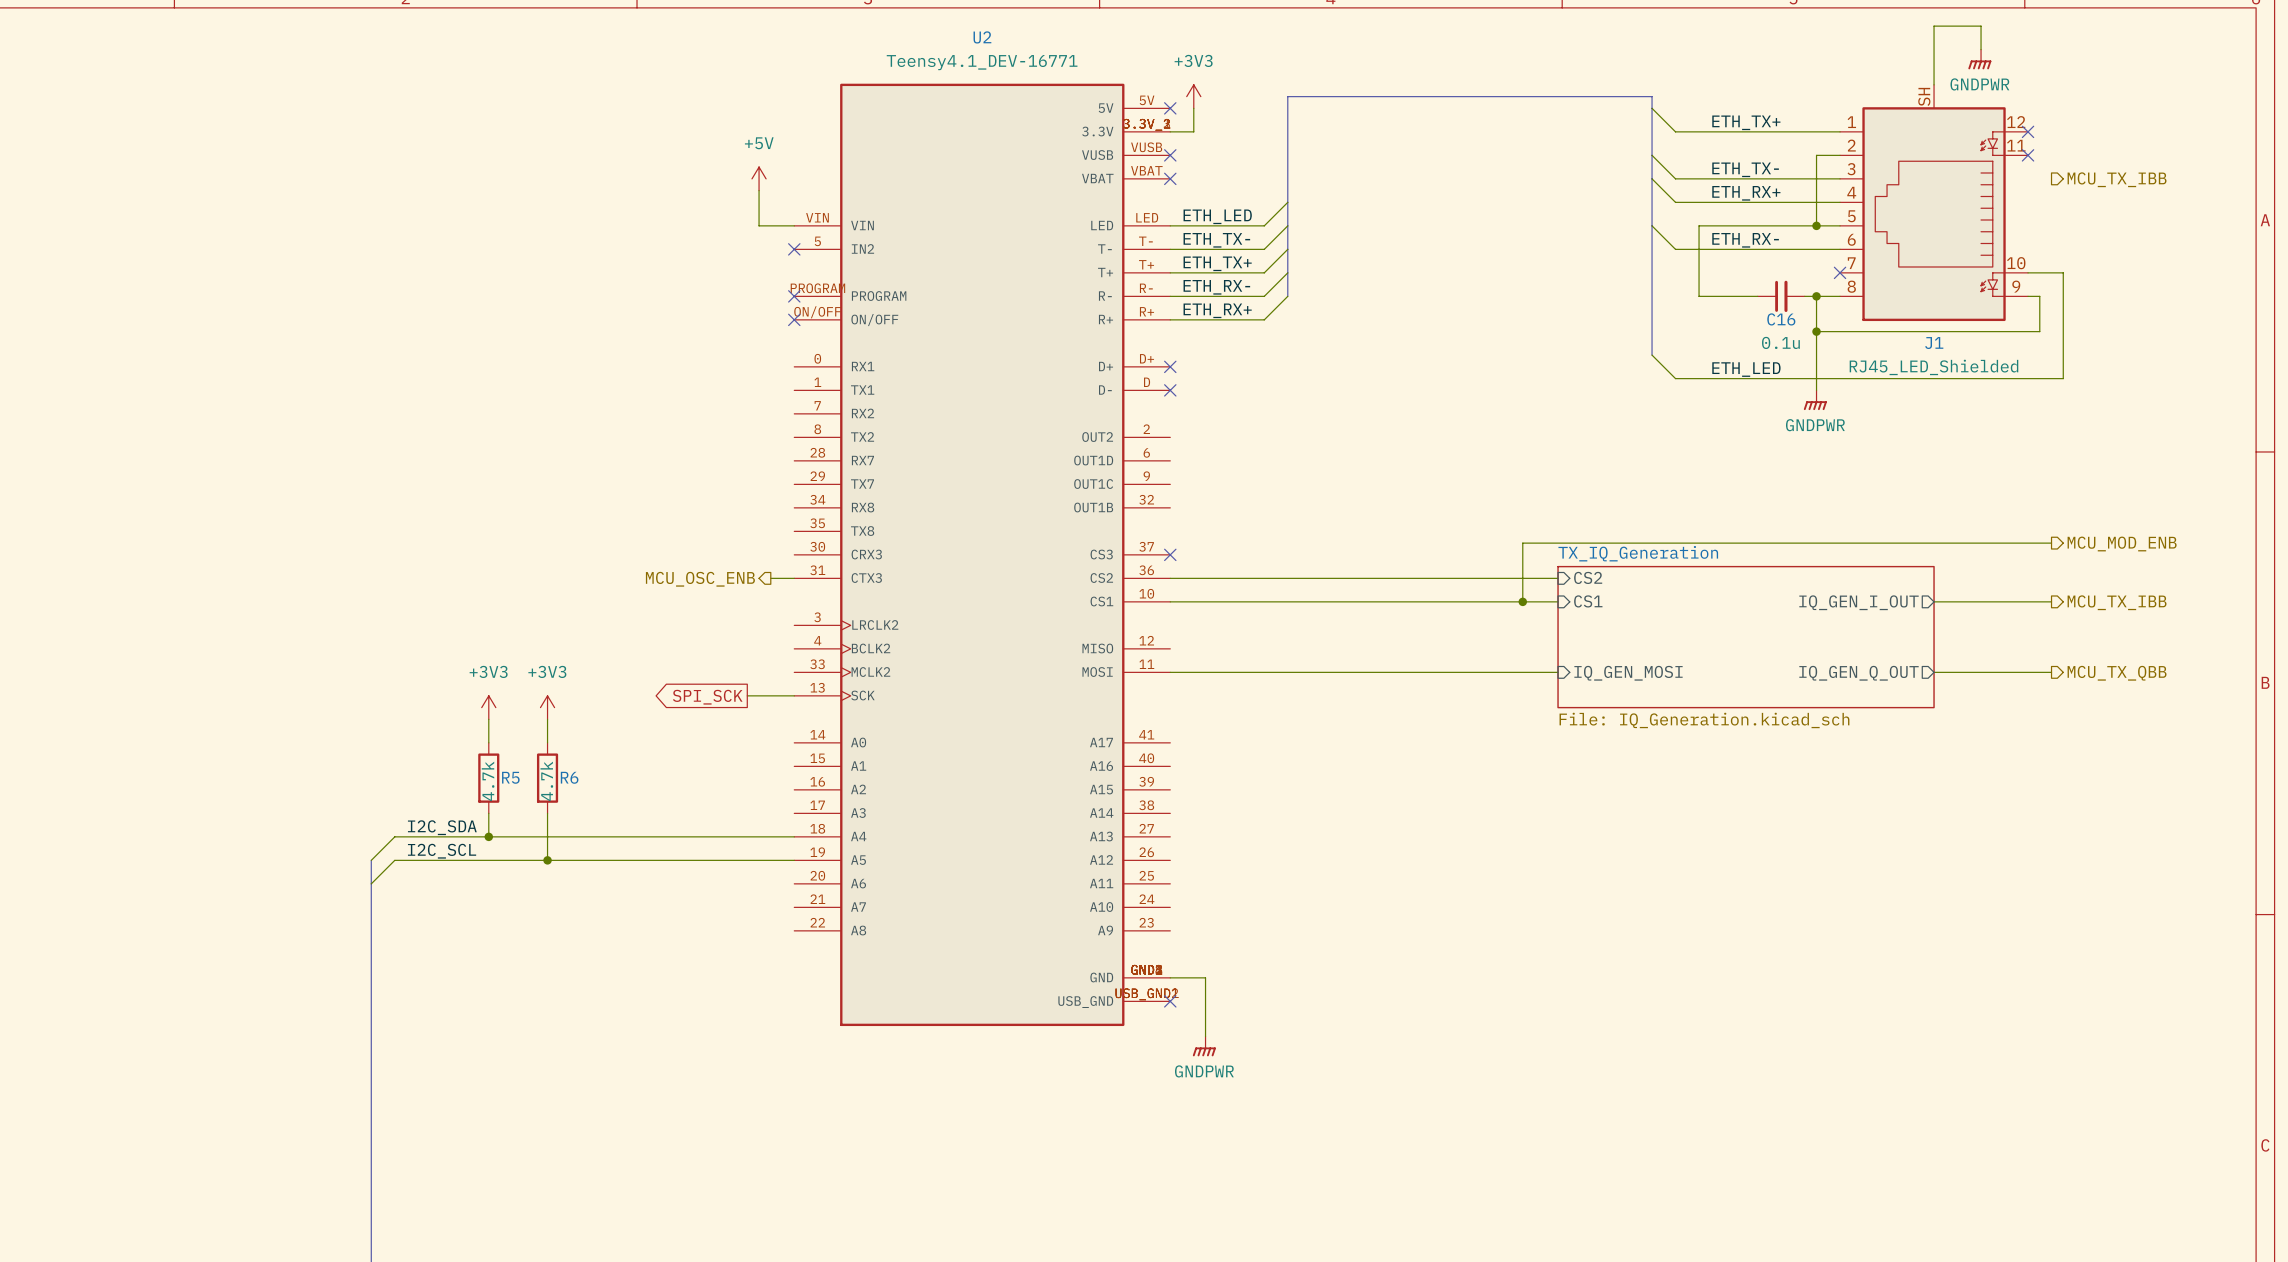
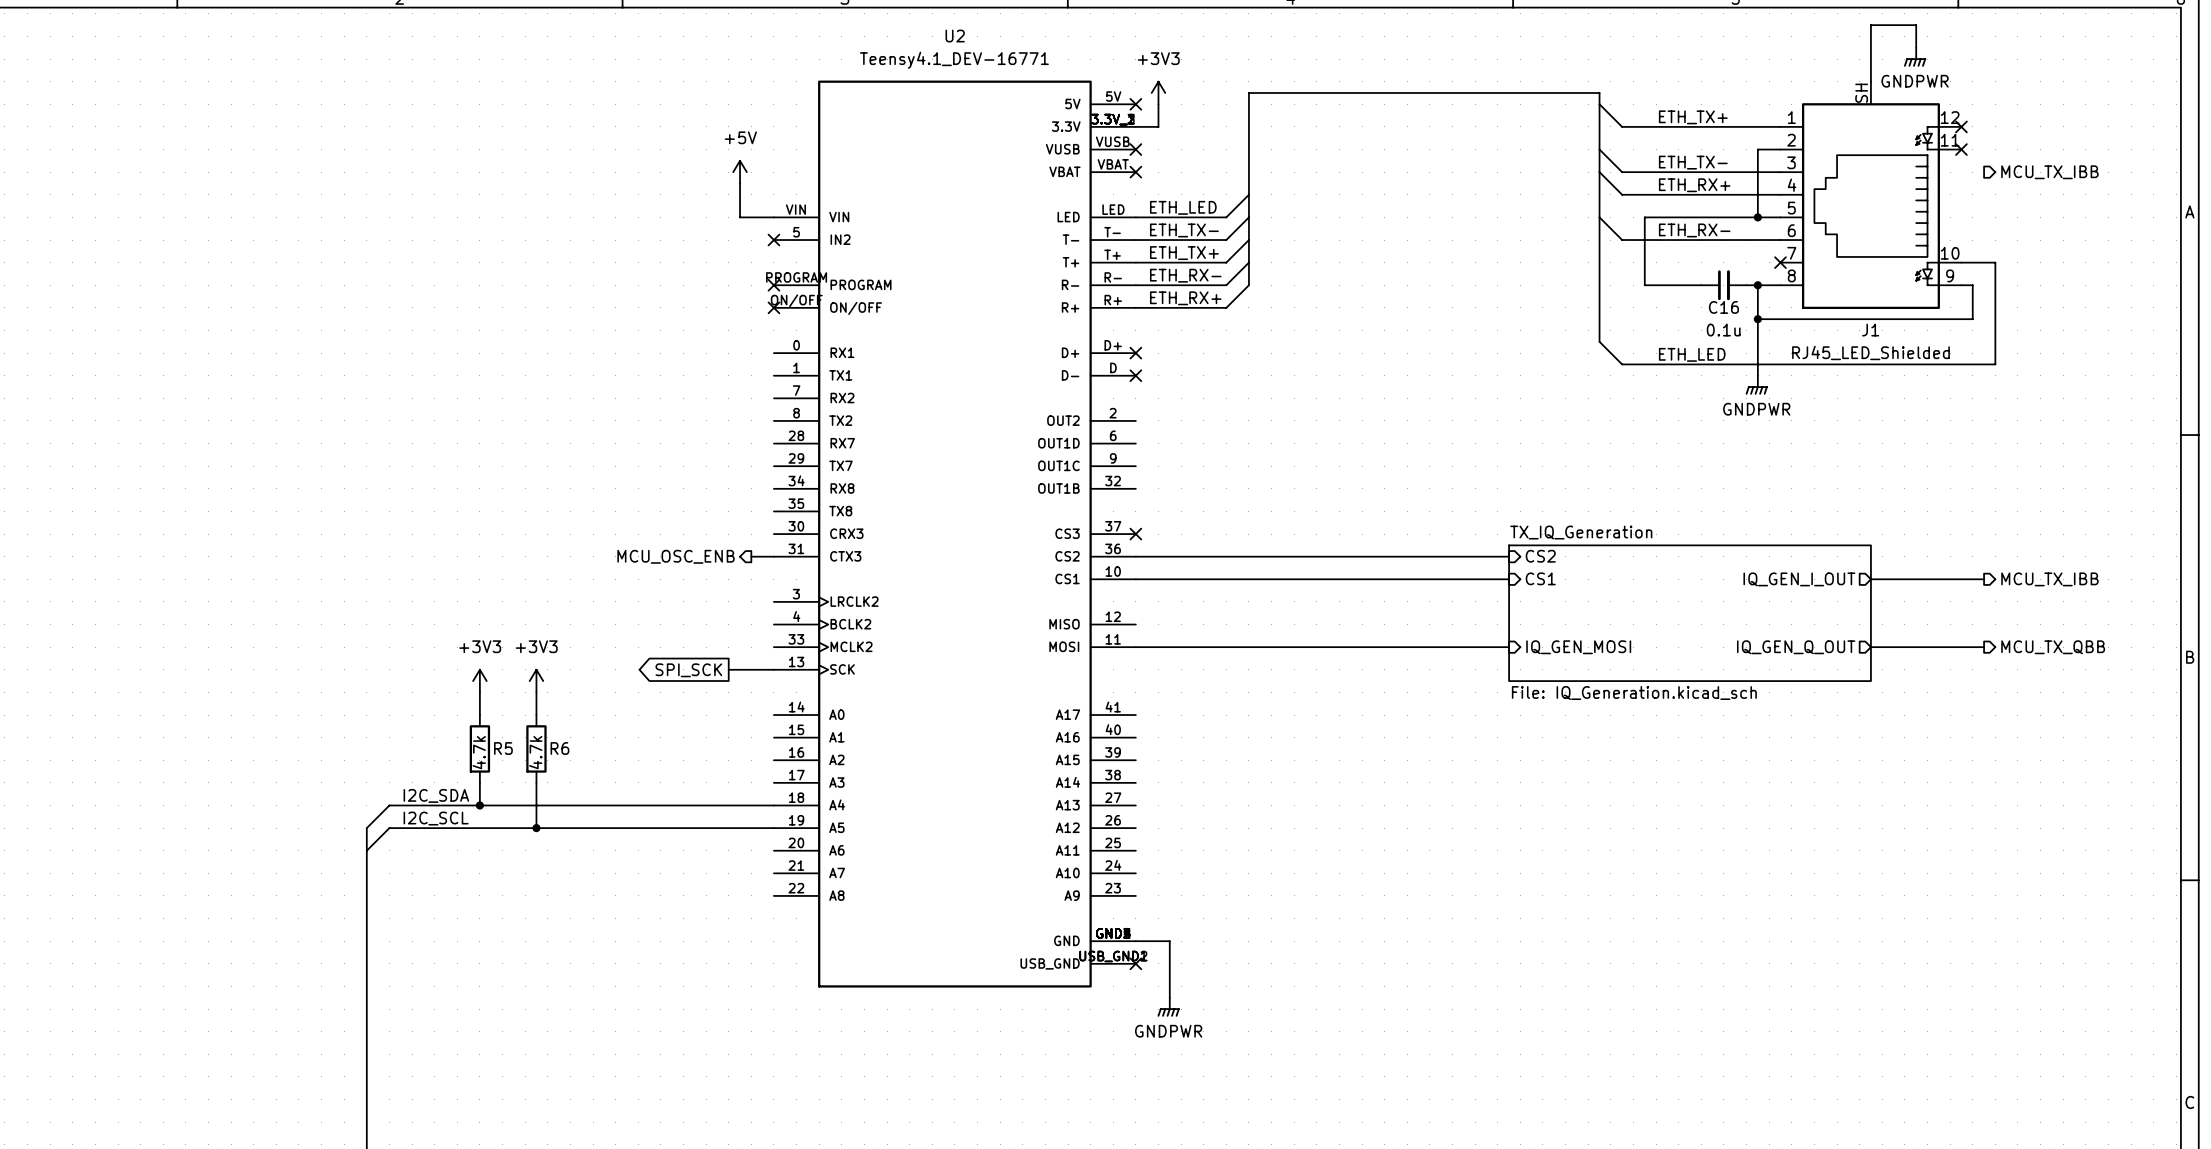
wire: (2051, 543) (1522, 543) (1522, 601) -> none
hierarchical label: MCU_MOD_ENB (2122, 544) -> none
junction: (1522, 601) -> none

